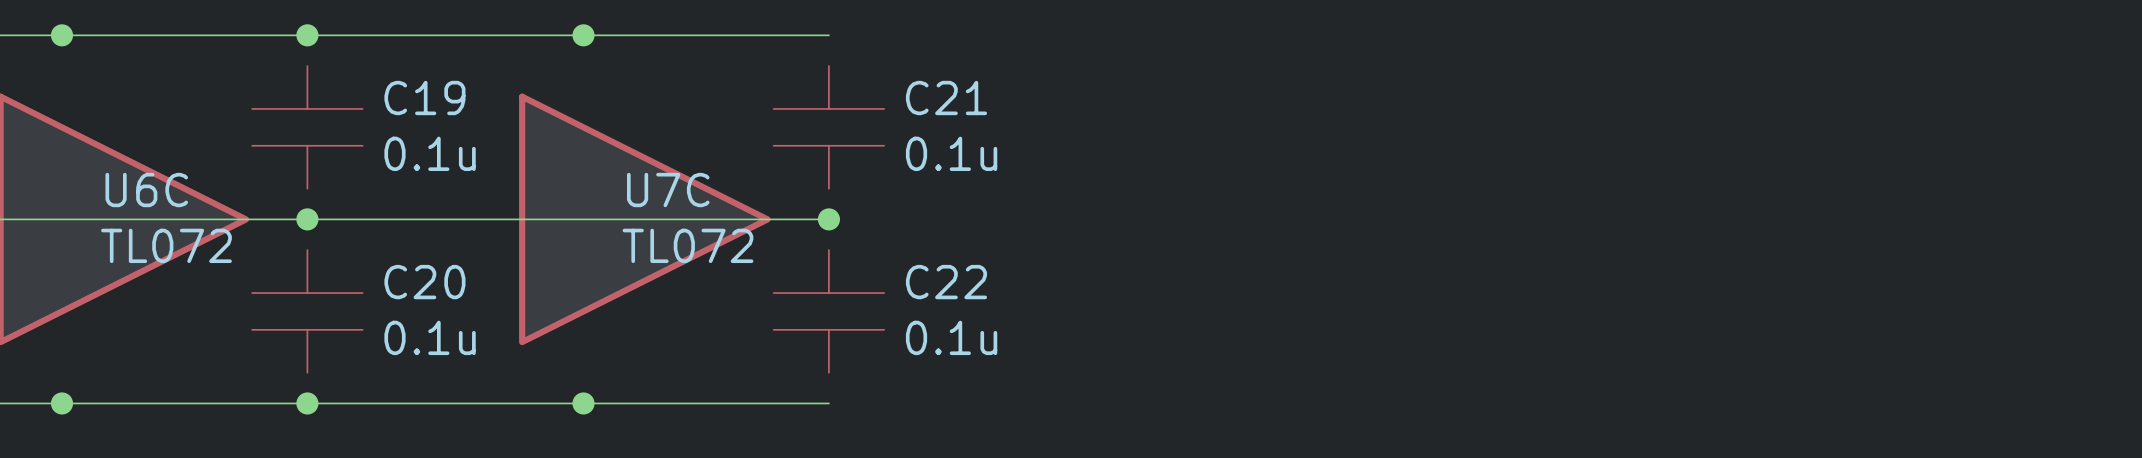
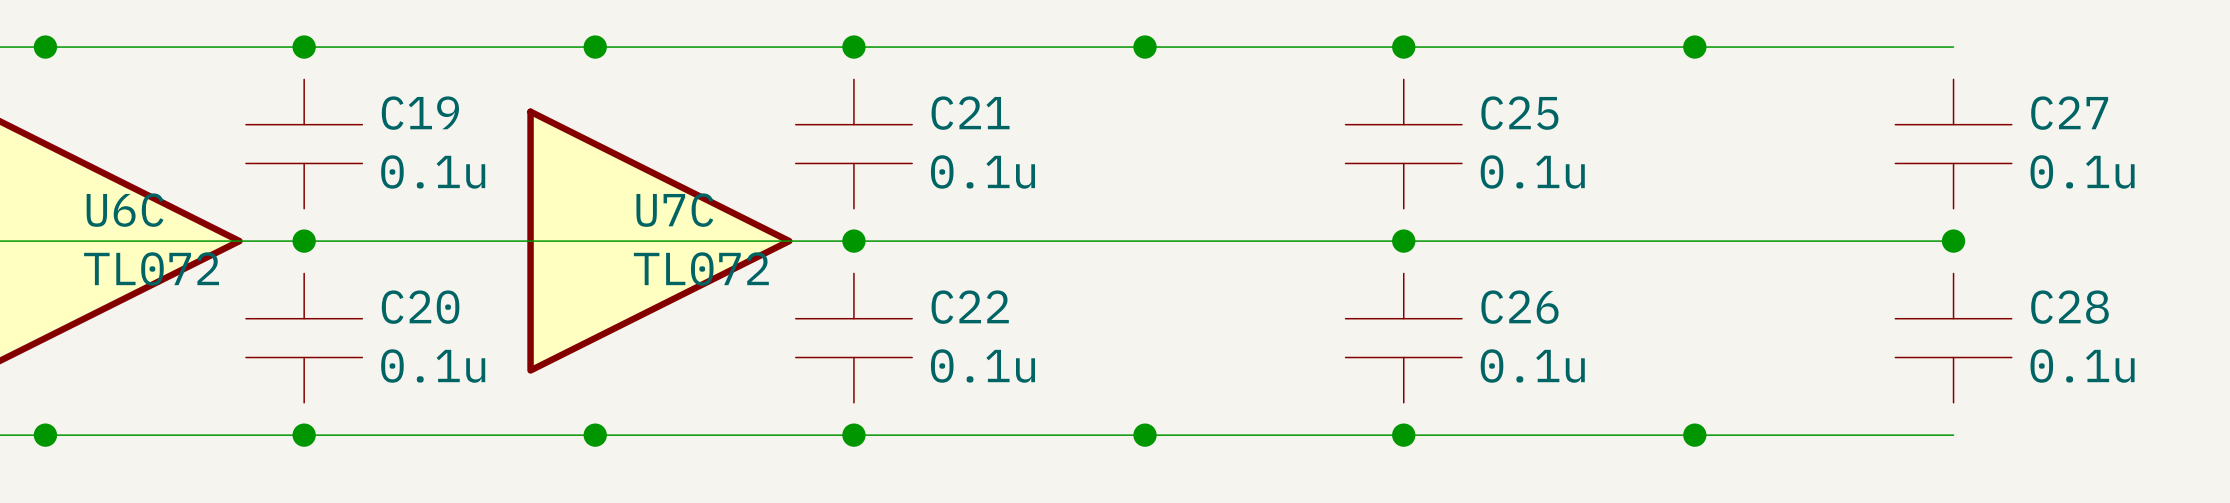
wire: none -> (853, 47) (1953, 47)
junction: none -> (853, 47)
junction: none -> (1145, 47)
junction: none -> (1403, 47)
junction: none -> (1694, 47)
C25: none -> 0.1u (1403, 144)
C27: none -> 0.1u (1953, 144)
wire: none -> (853, 241) (1953, 241)
junction: none -> (1403, 241)
junction: none -> (1953, 241)
C26: none -> 0.1u (1403, 338)
C28: none -> 0.1u (1953, 338)
wire: none -> (853, 435) (1953, 435)
junction: none -> (853, 435)
junction: none -> (1145, 435)
junction: none -> (1403, 435)
junction: none -> (1694, 435)

